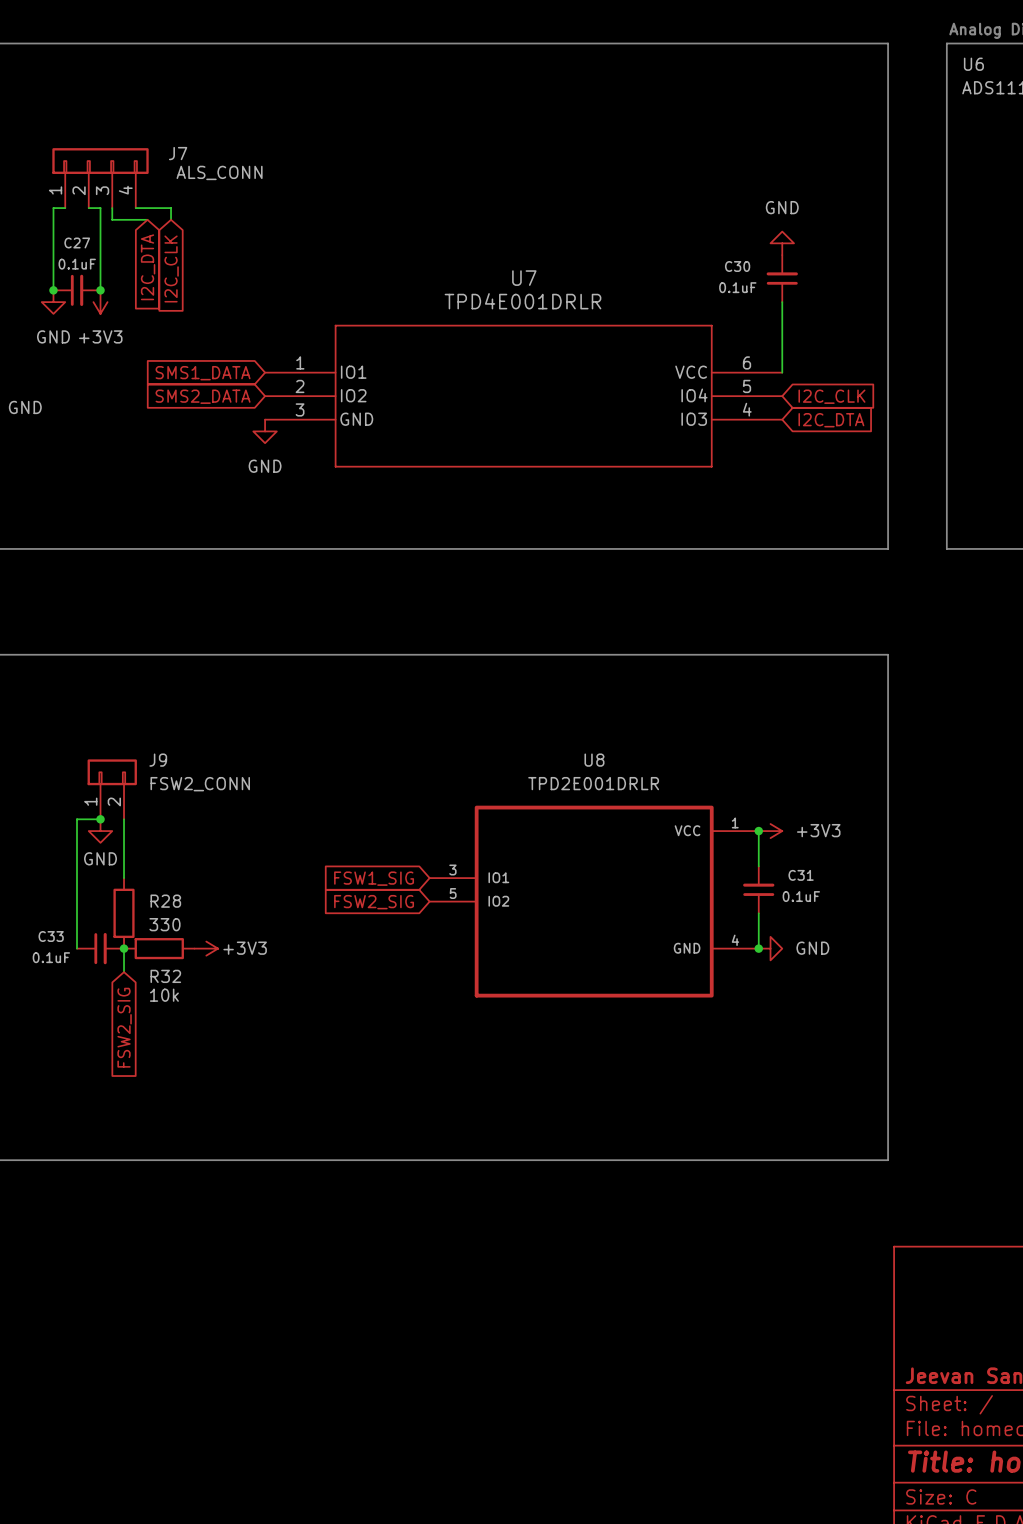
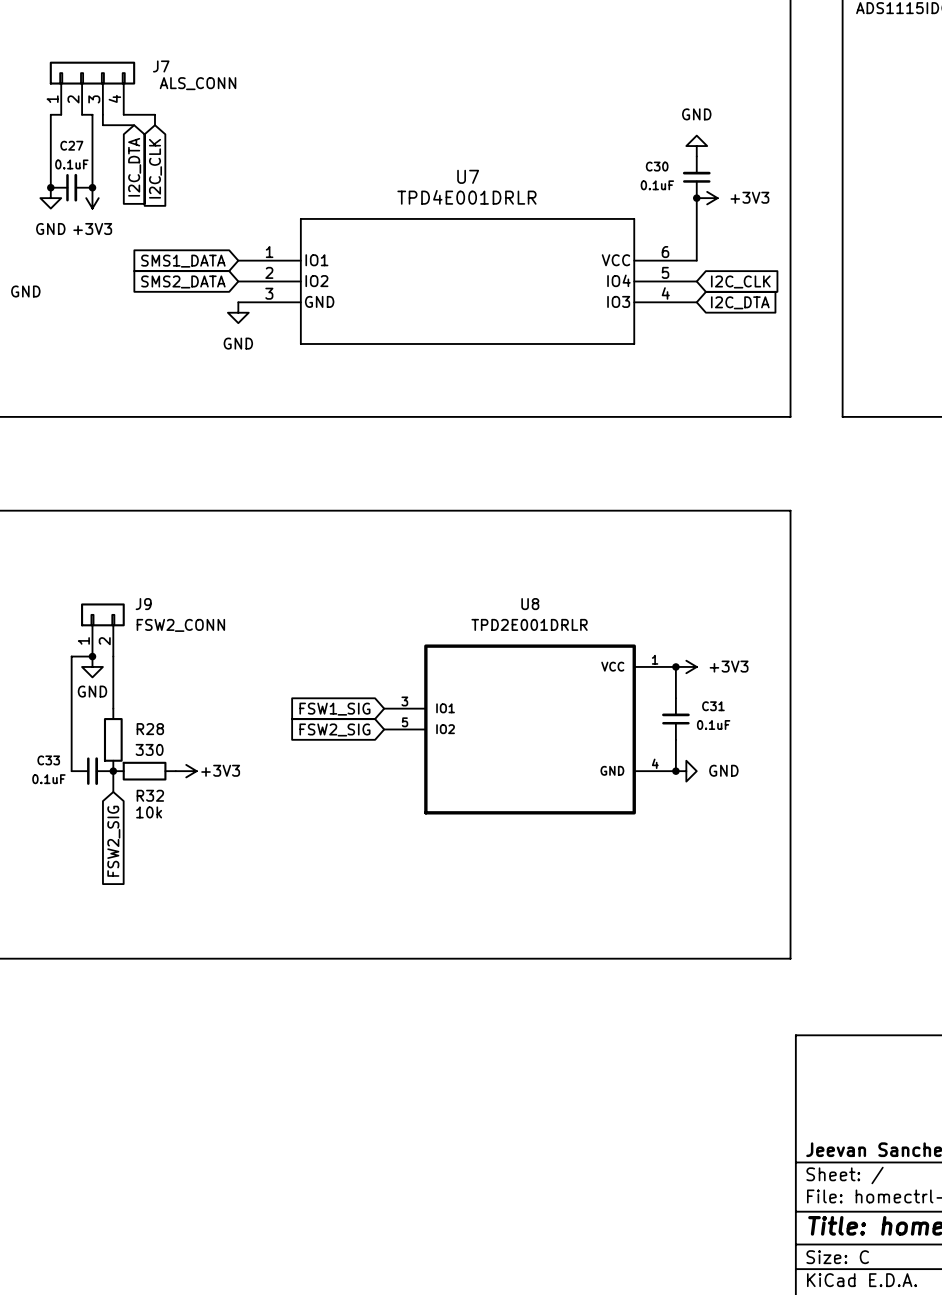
junction: none -> (696, 198)
power symbol: none -> +3V3 (707, 198)

